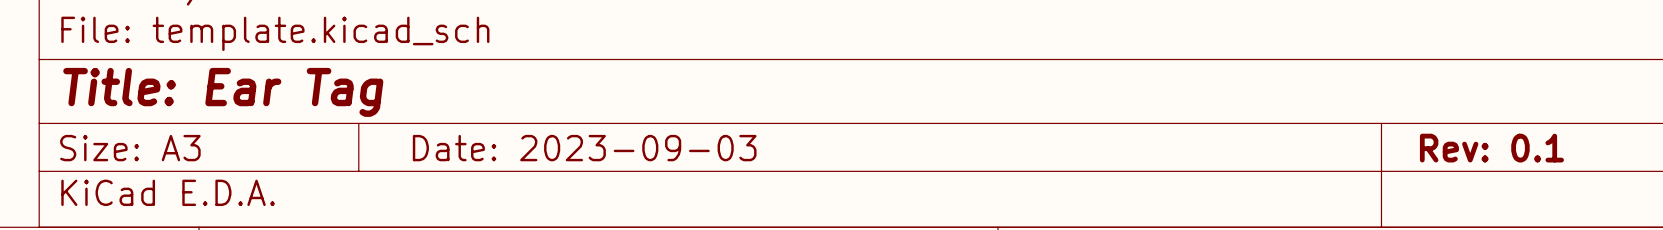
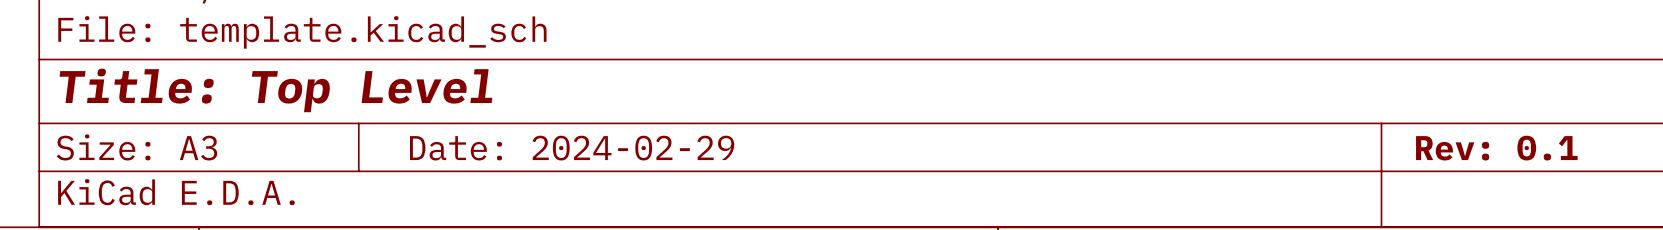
title block: Title: Ear Tag (223, 92) -> Title: Top Level (275, 90)
title block: Date: 2023-09-03 (584, 148) -> Date: 2024-02-29 (572, 148)

